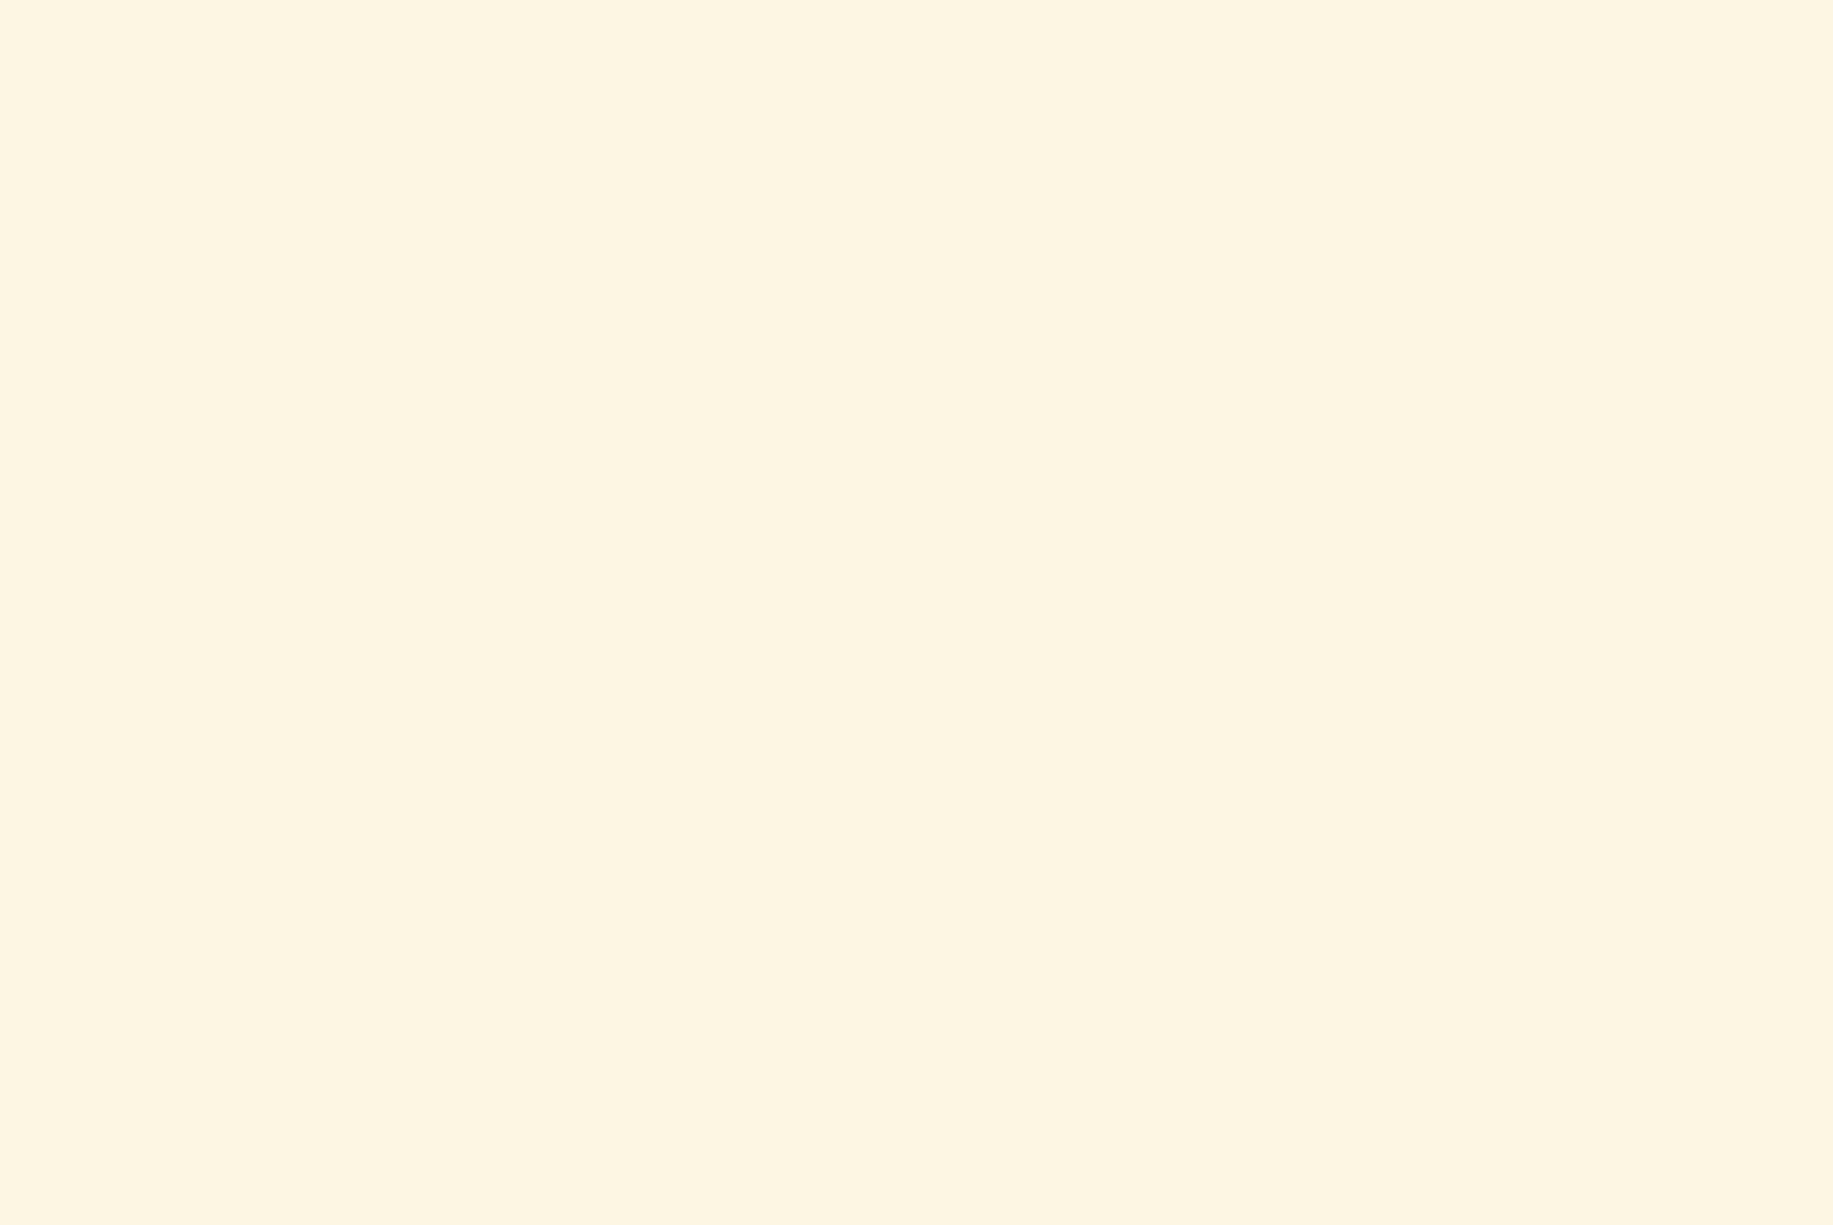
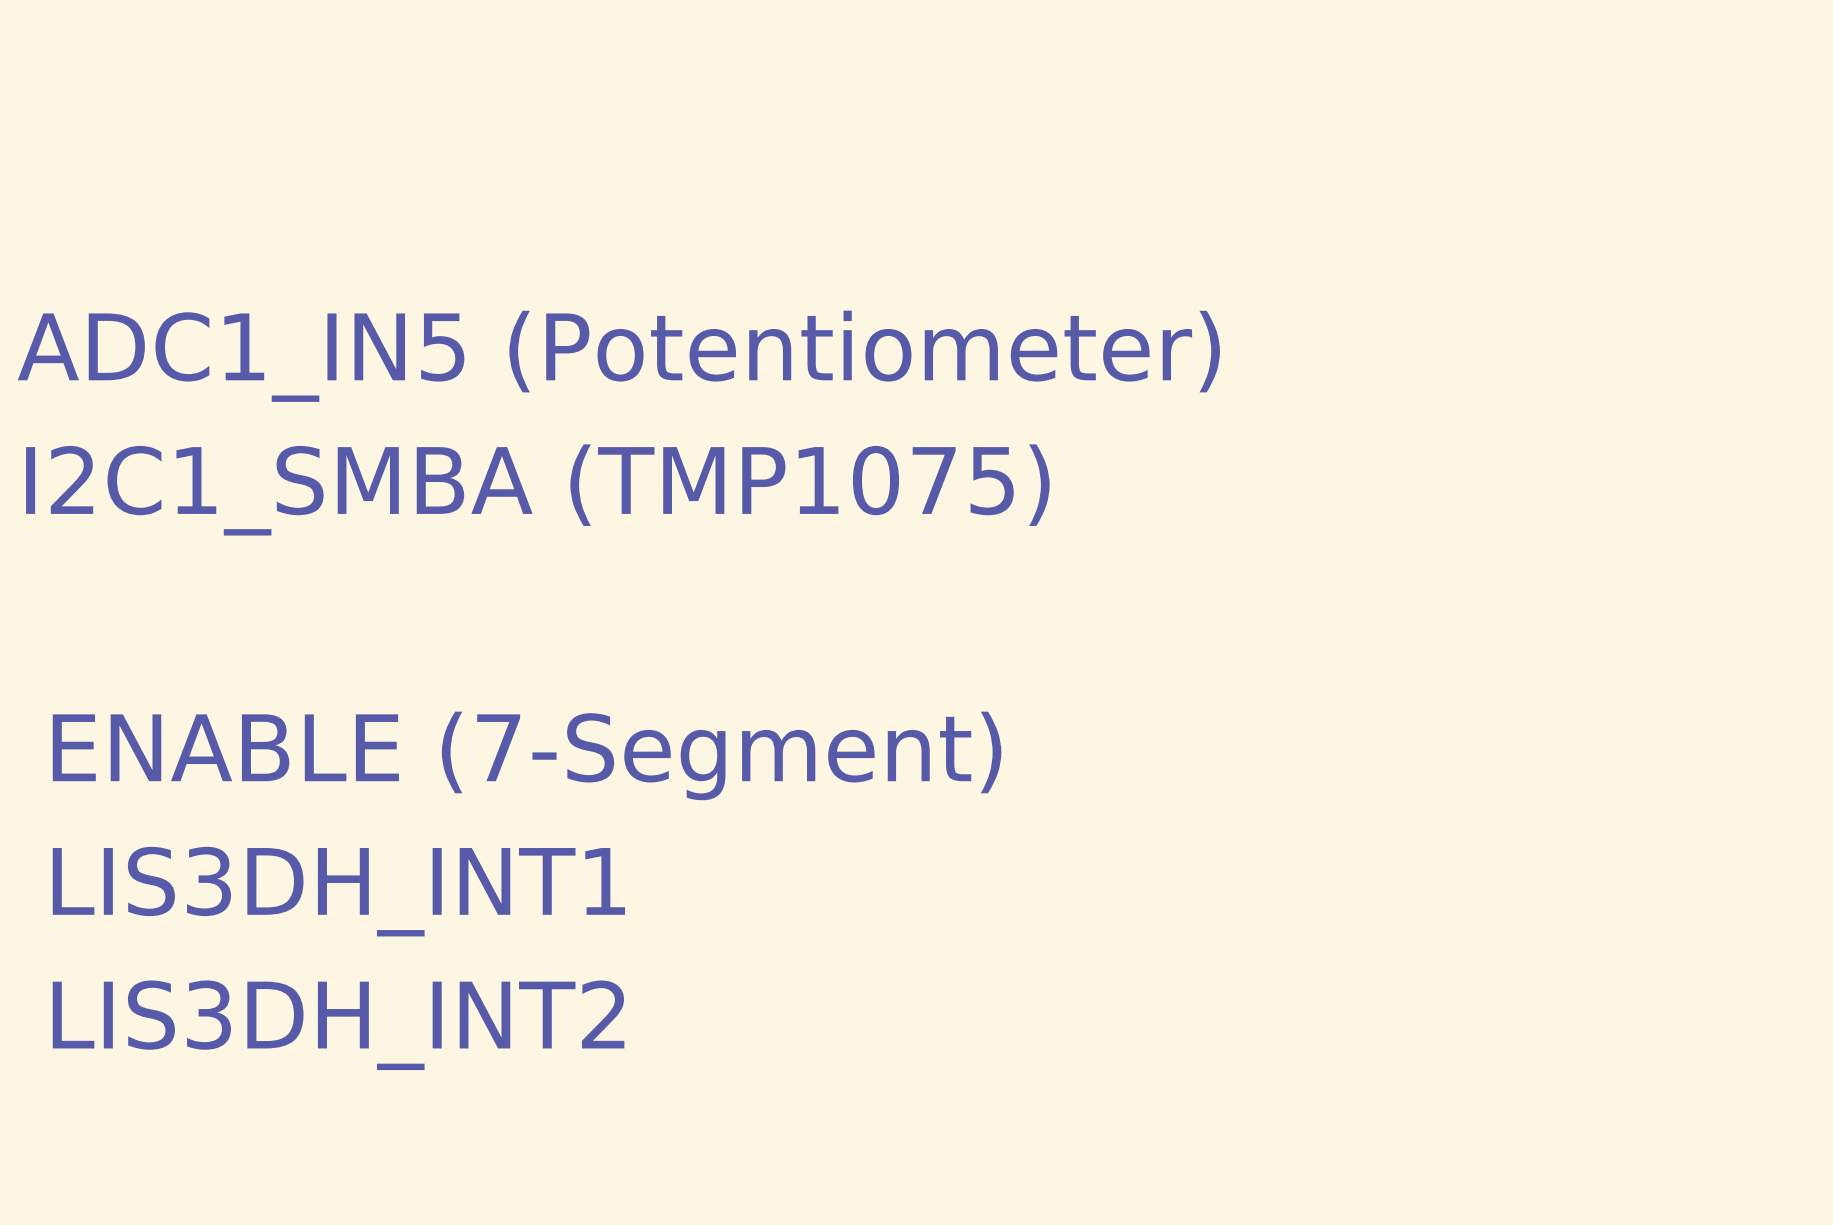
text: none -> ADC1_IN5 (Potentiometer) (618, 356)
text: none -> I2C1_SMBA (TMP1075) (537, 489)
text: none -> ENABLE (7-Segment) (527, 755)
text: none -> LIS3DH_INT1 (338, 891)
text: none -> LIS3DH_INT2 (338, 1025)

